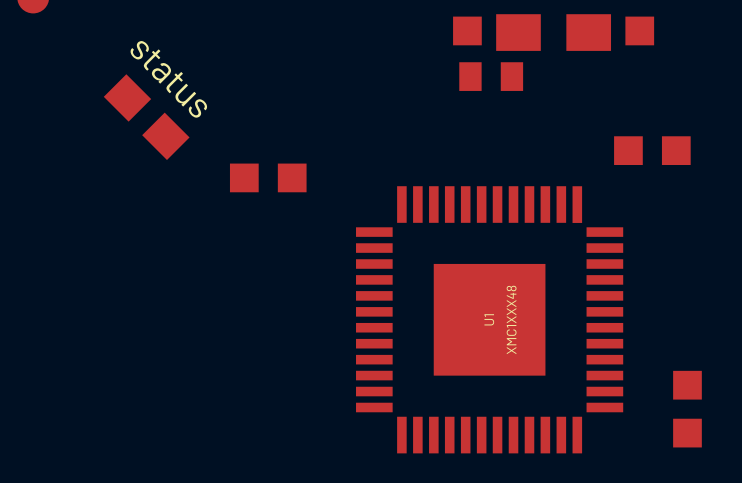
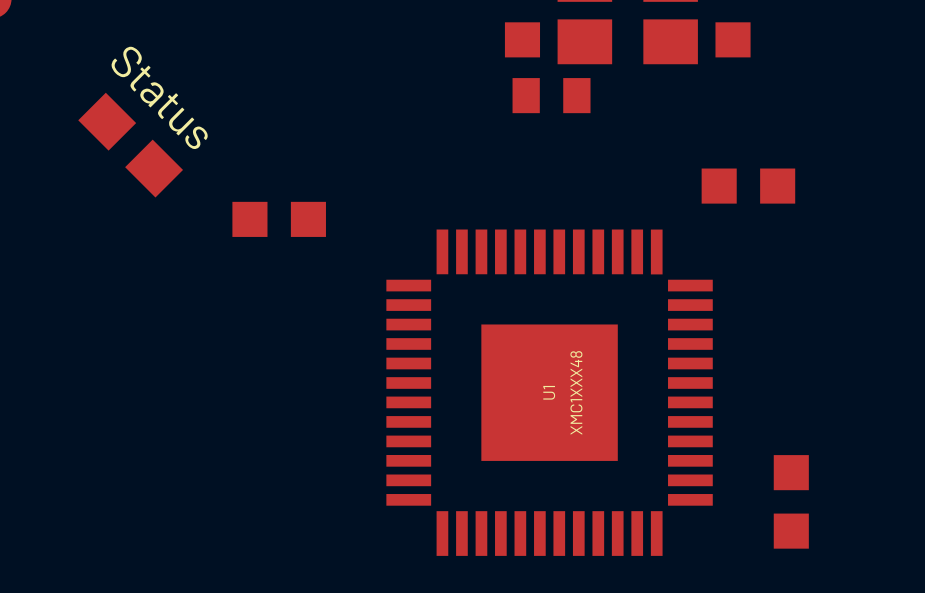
text: status (168, 79) -> Status (159, 97)

